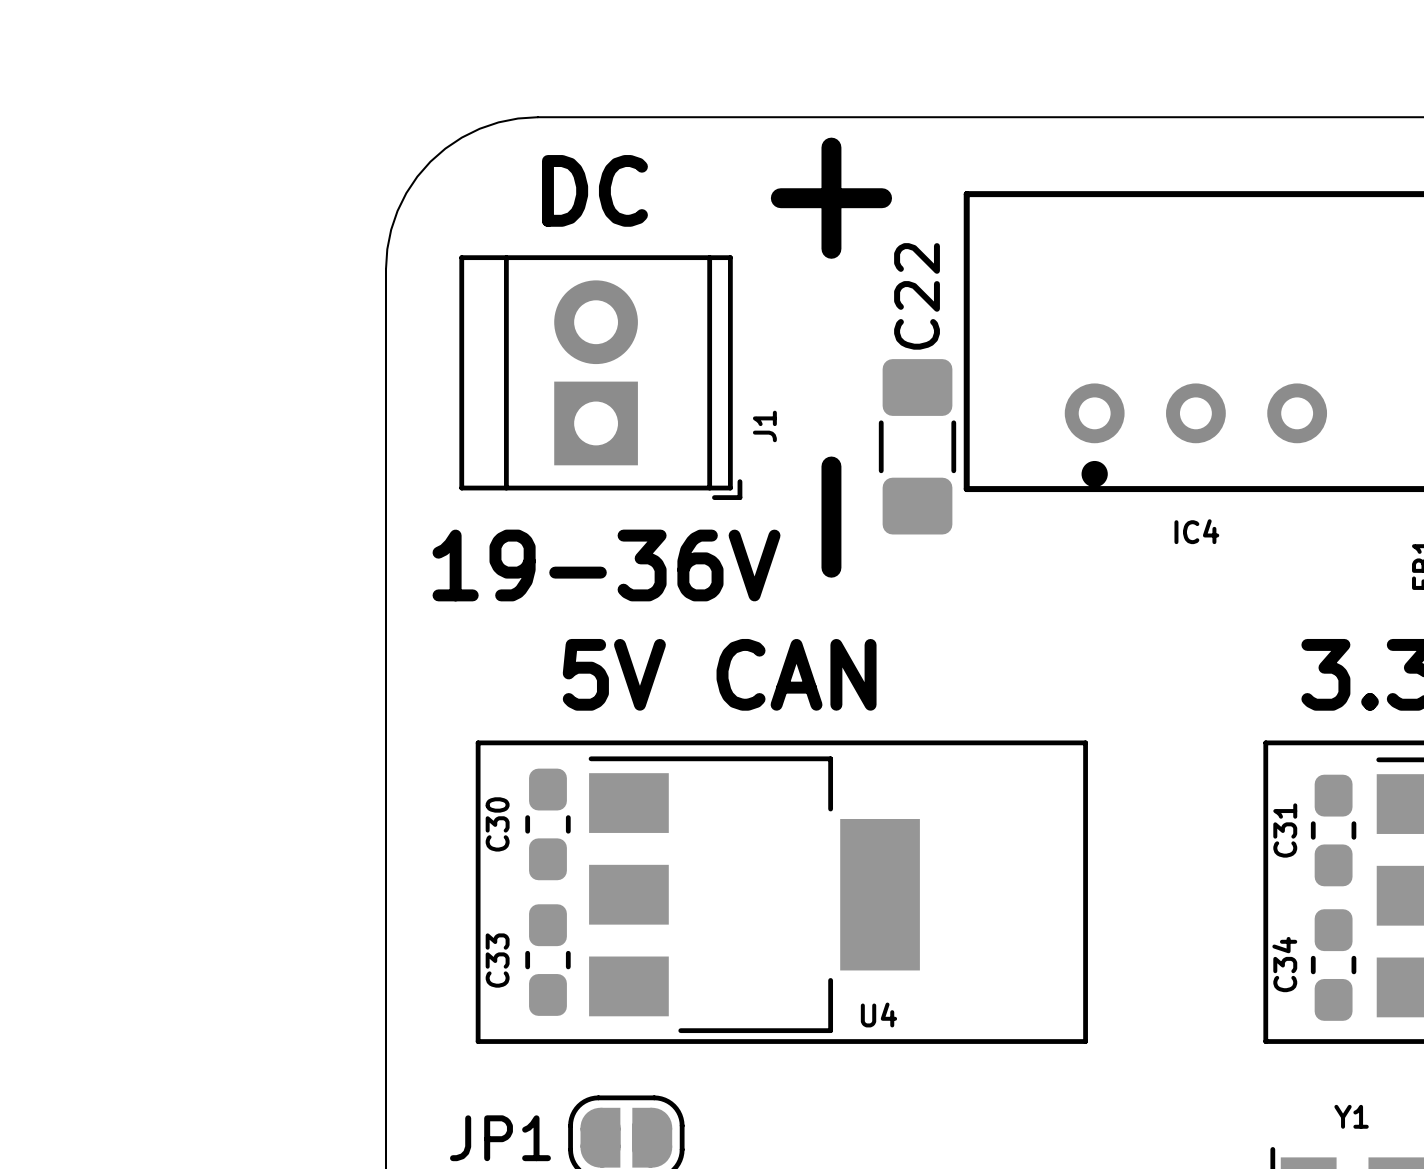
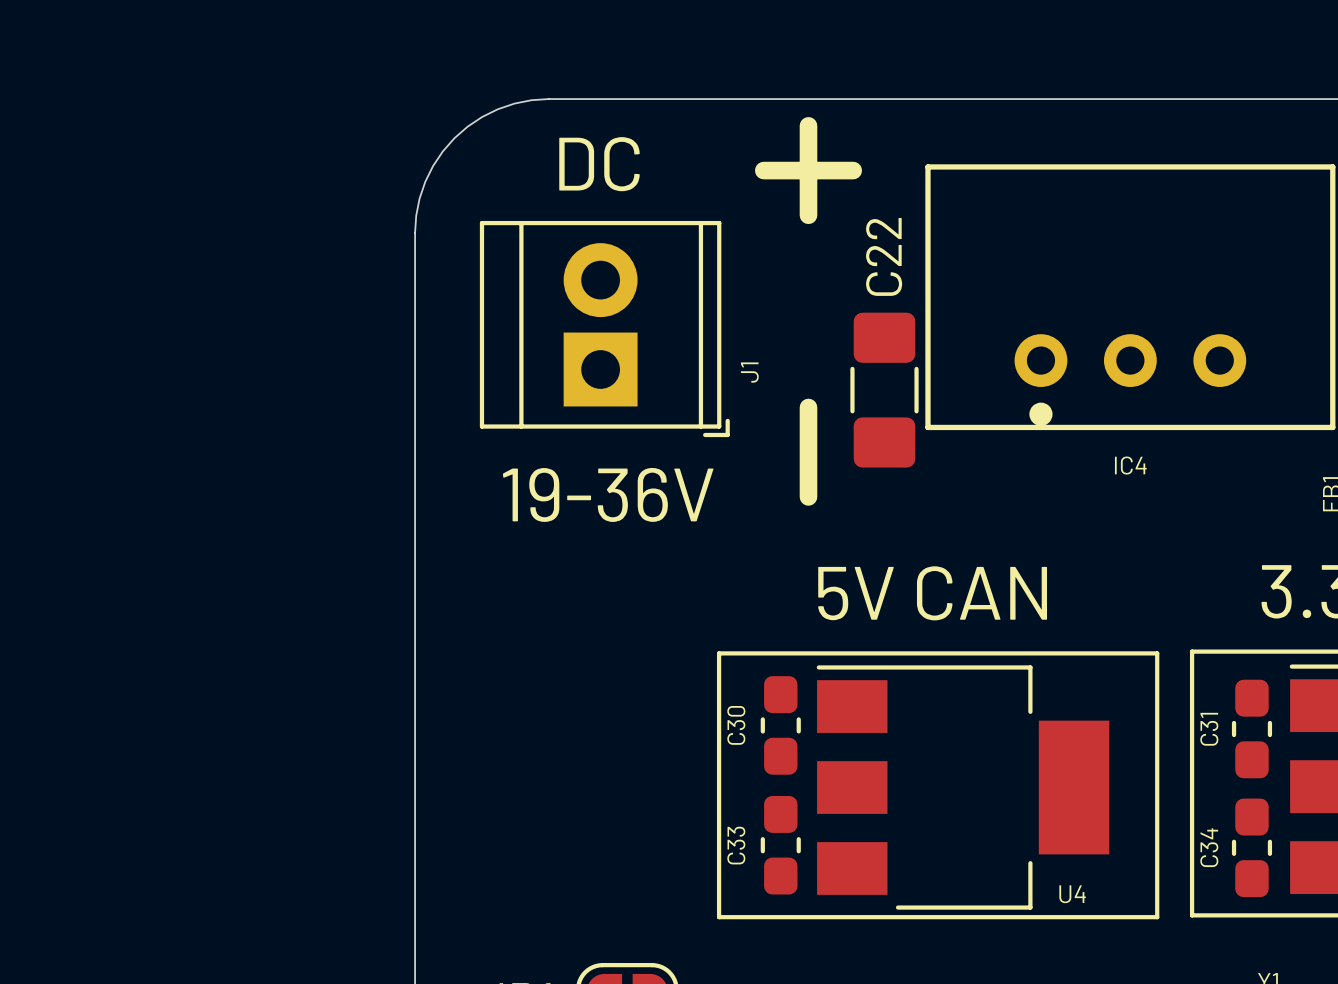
text position: 5V CAN (719, 674) -> 5V CAN (932, 593)
line: (478, 742) (1085, 742) (1085, 1041) (478, 1041) (478, 742) -> none
line: none -> (719, 653) (719, 917) (1157, 917) (1157, 653) (719, 653)
C30 position: (547, 824) -> (780, 725)
U4 position: (754, 894) -> (962, 787)
C33 position: (547, 960) -> (780, 845)

